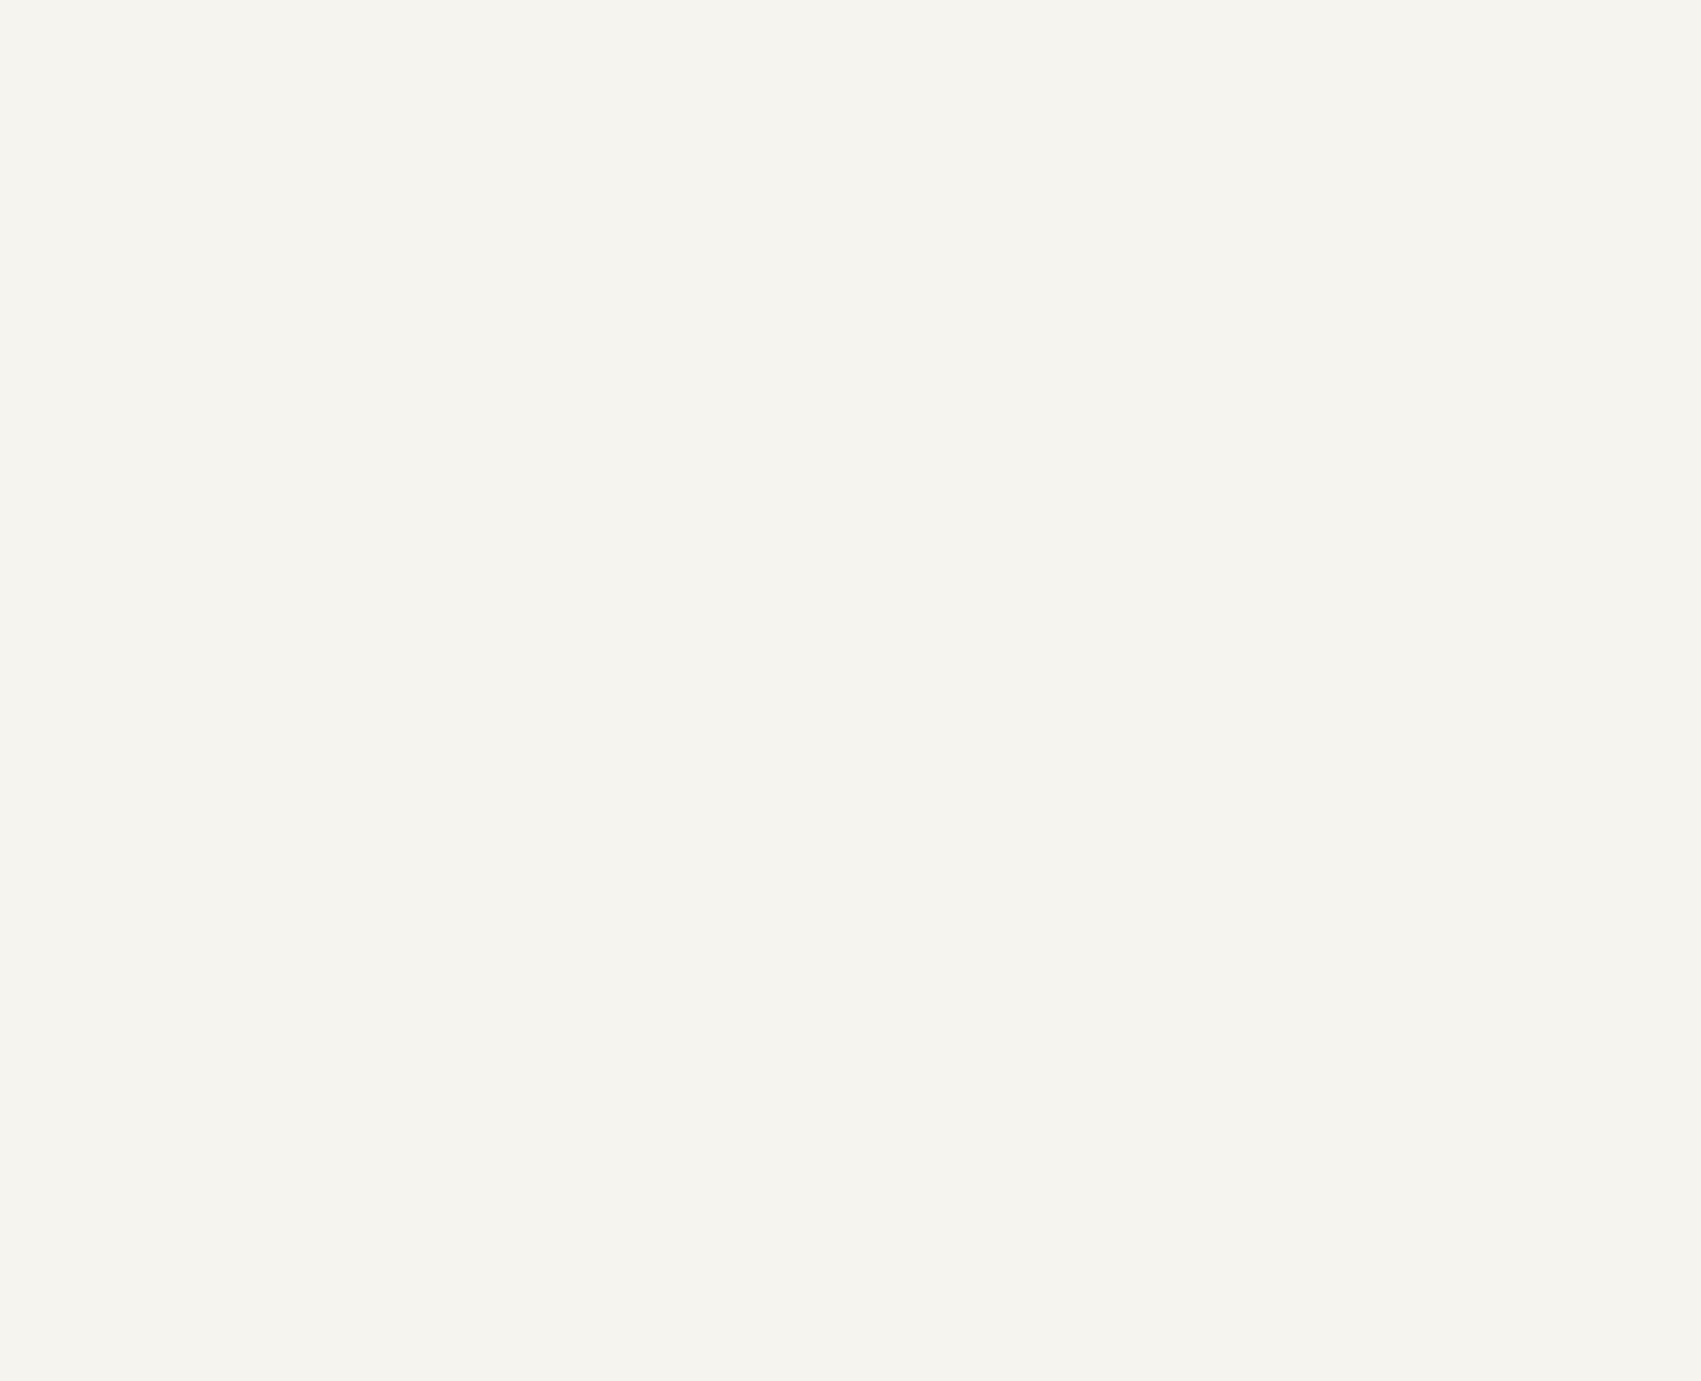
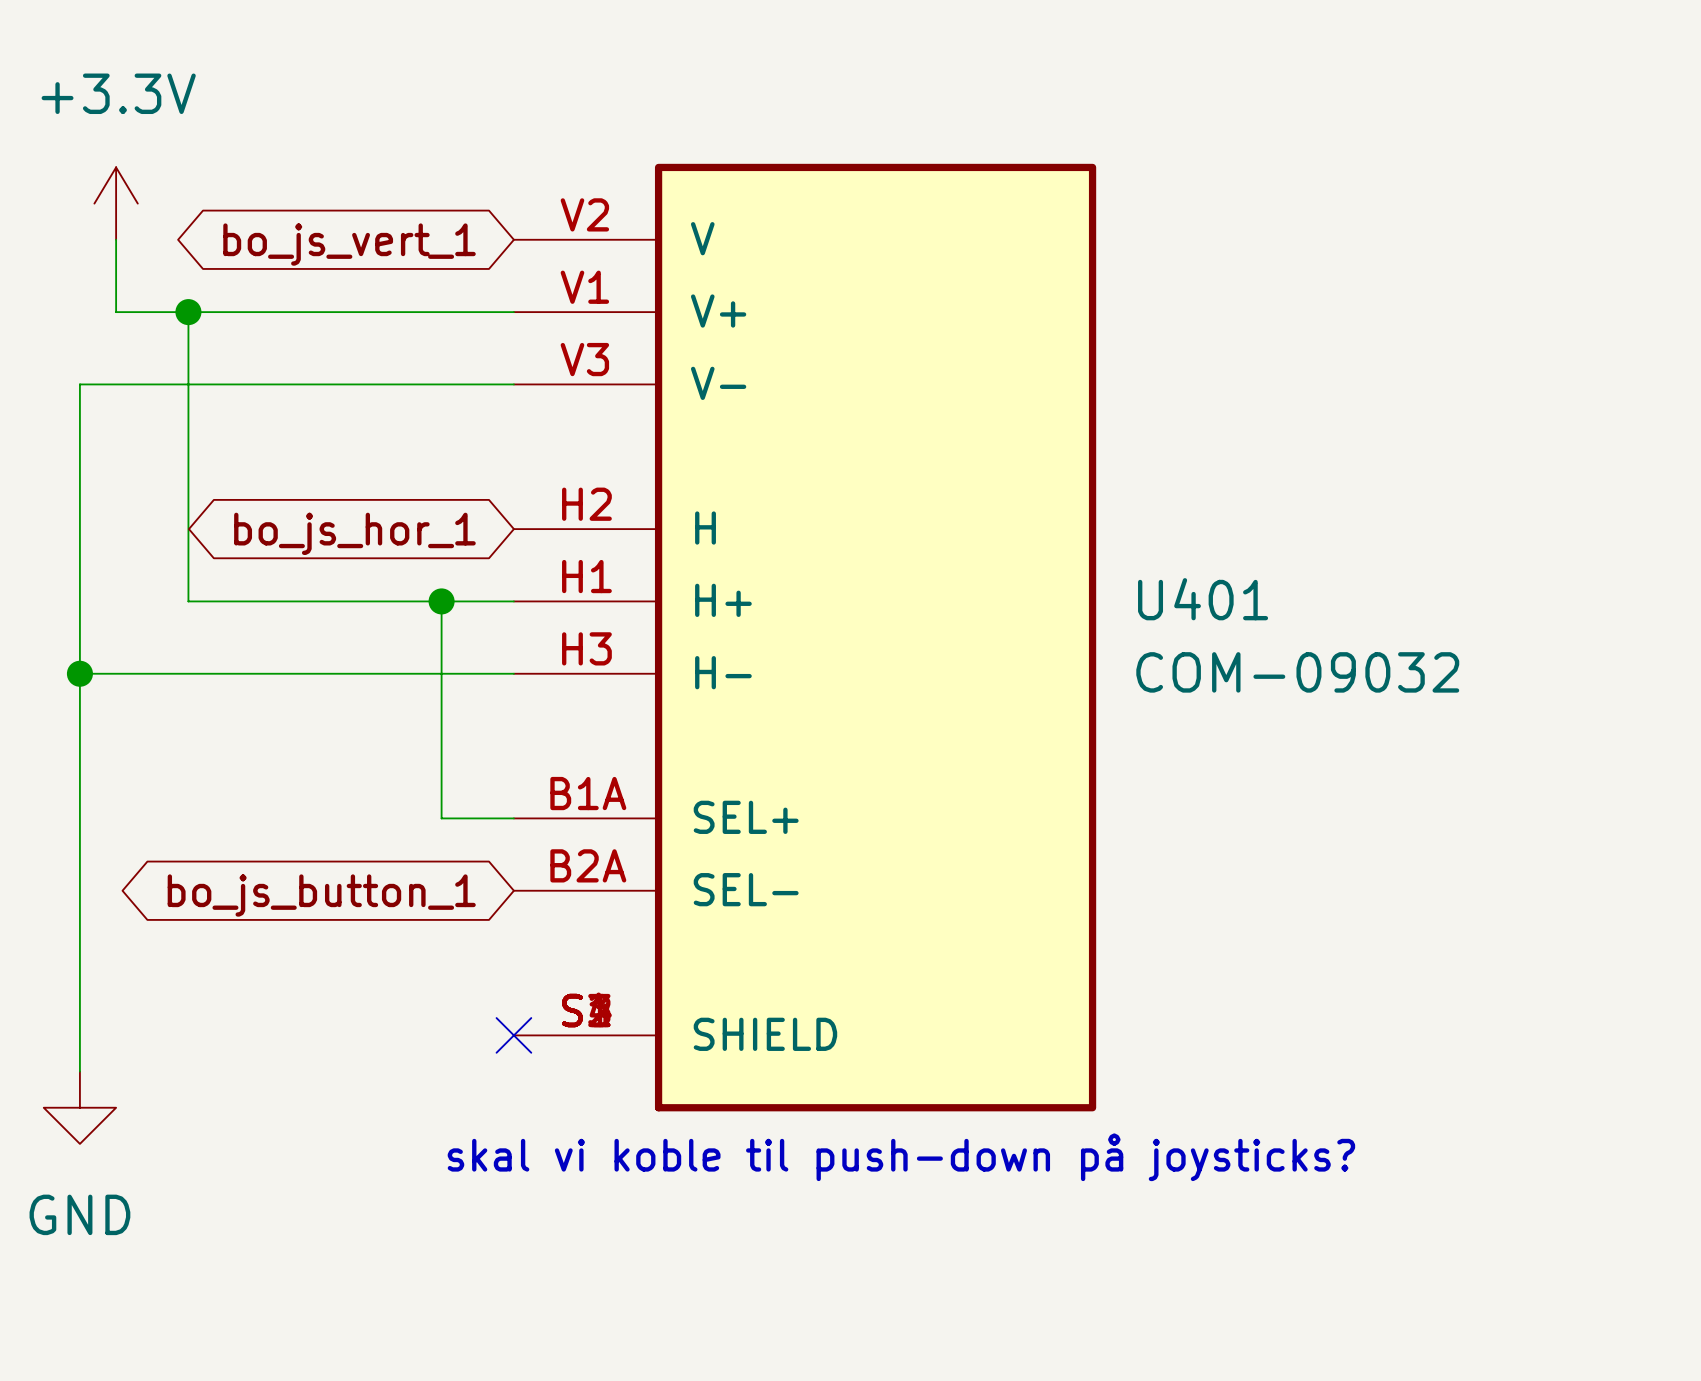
power symbol: none -> +3.3V (116, 203)
wire: none -> (116, 239) (116, 312) (513, 312)
global label: none -> bo_js_vert_1 (349, 244)
wire: none -> (188, 312) (188, 601) (513, 601)
junction: none -> (188, 312)
wire: none -> (513, 384) (79, 384) (79, 1071)
global label: none -> bo_js_hor_1 (354, 533)
wire: none -> (441, 601) (441, 818) (513, 818)
junction: none -> (441, 601)
U401: none -> COM-09032 (805, 637)
wire: none -> (79, 673) (513, 673)
junction: none -> (79, 673)
global label: none -> bo_js_button_1 (321, 895)
no-connect mark: none -> (513, 1035)
power symbol: none -> GND (79, 1107)
text: none -> skal vi koble til push-down på joysticks? (901, 1157)

